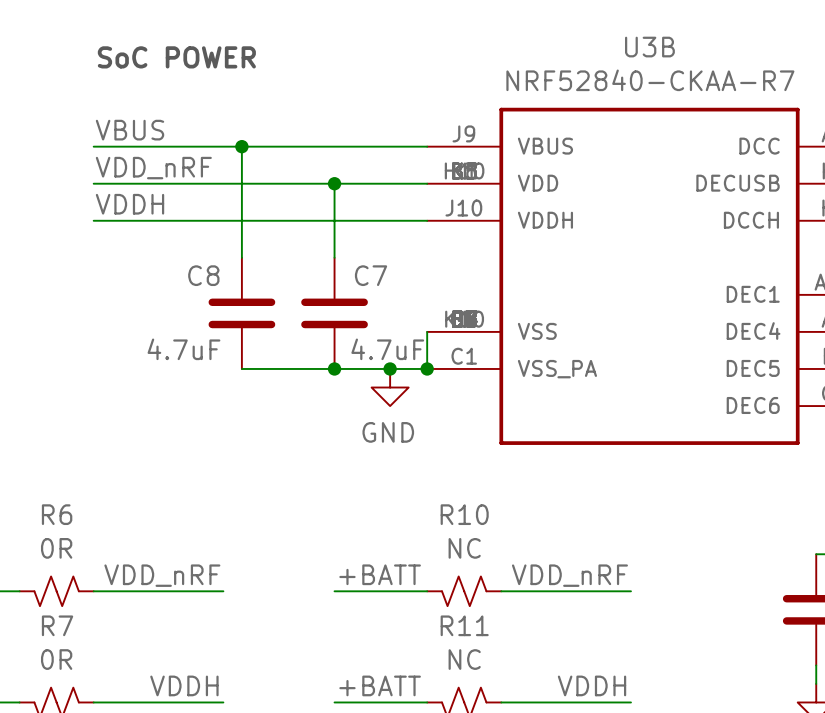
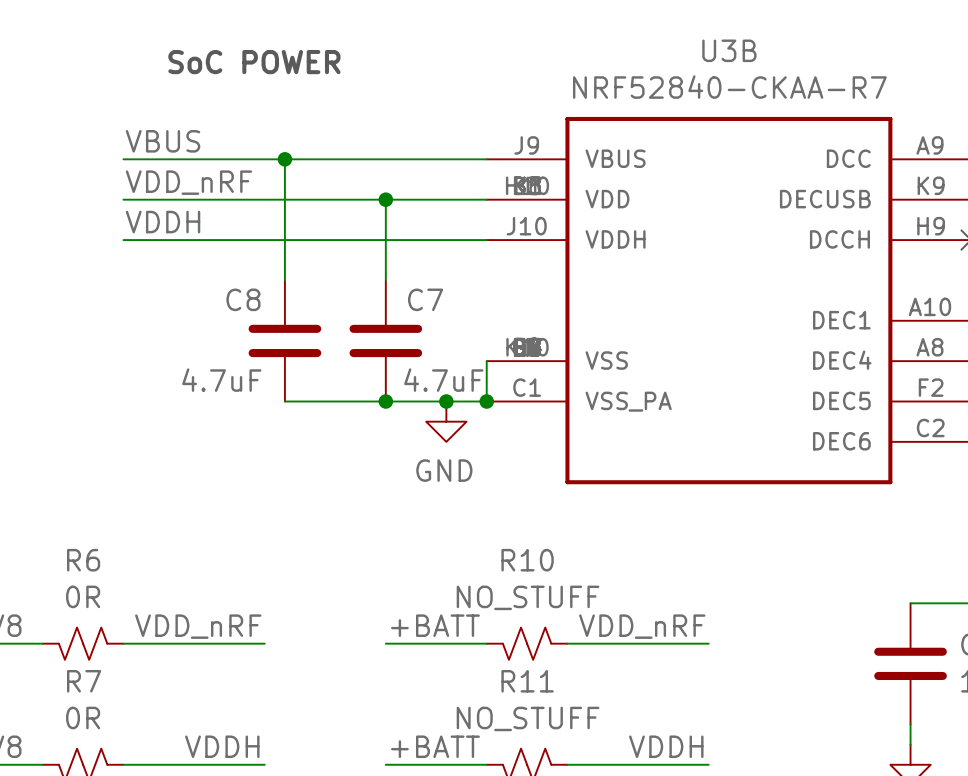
text position: SoC POWER (176, 57) -> SoC POWER (254, 62)
R10 value: NC (464, 548) -> NO_STUFF (528, 597)
R11 value: NC (464, 659) -> NO_STUFF (528, 718)

